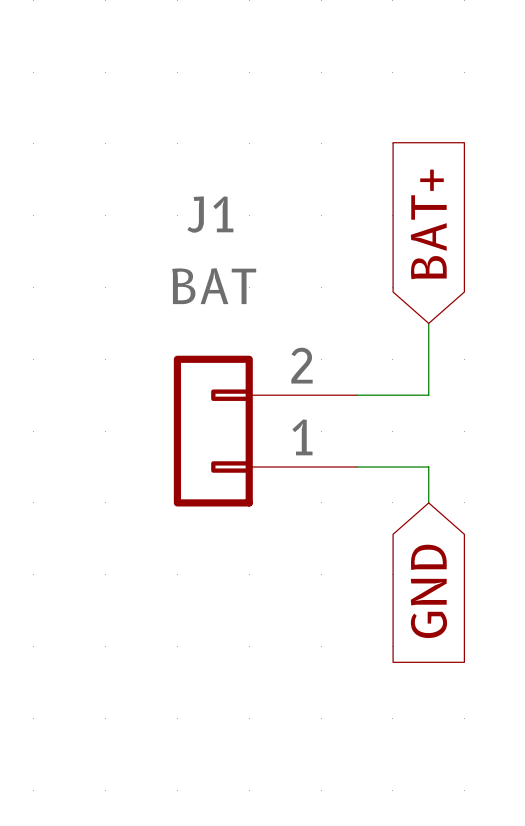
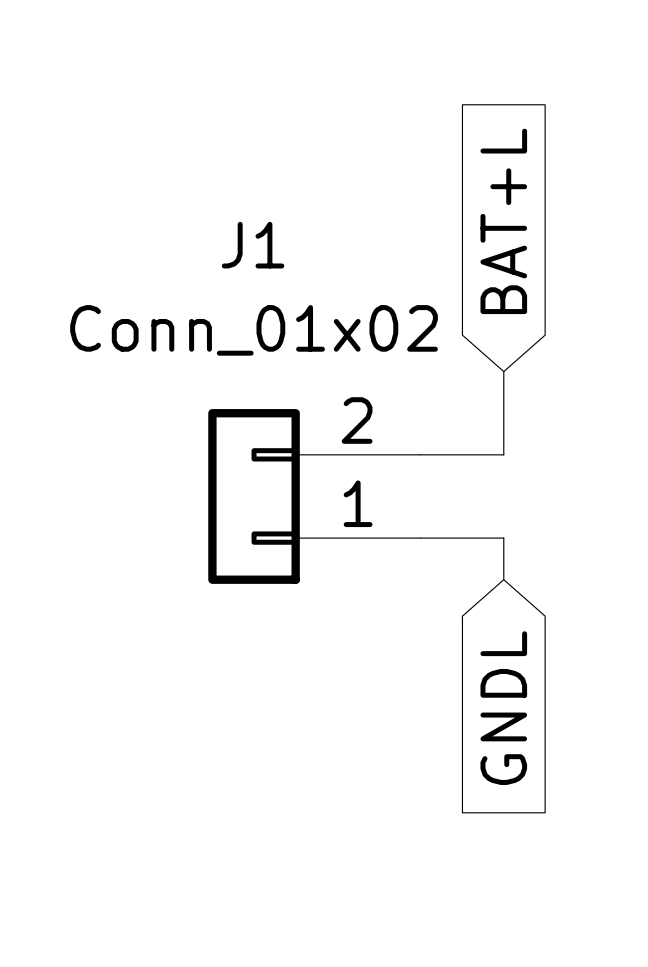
global label: BAT+ (428, 224) -> BAT+L (503, 221)
J1 value: BAT (214, 286) -> Conn_01x02 (254, 330)
global label: GND (428, 591) -> GNDL (503, 708)

